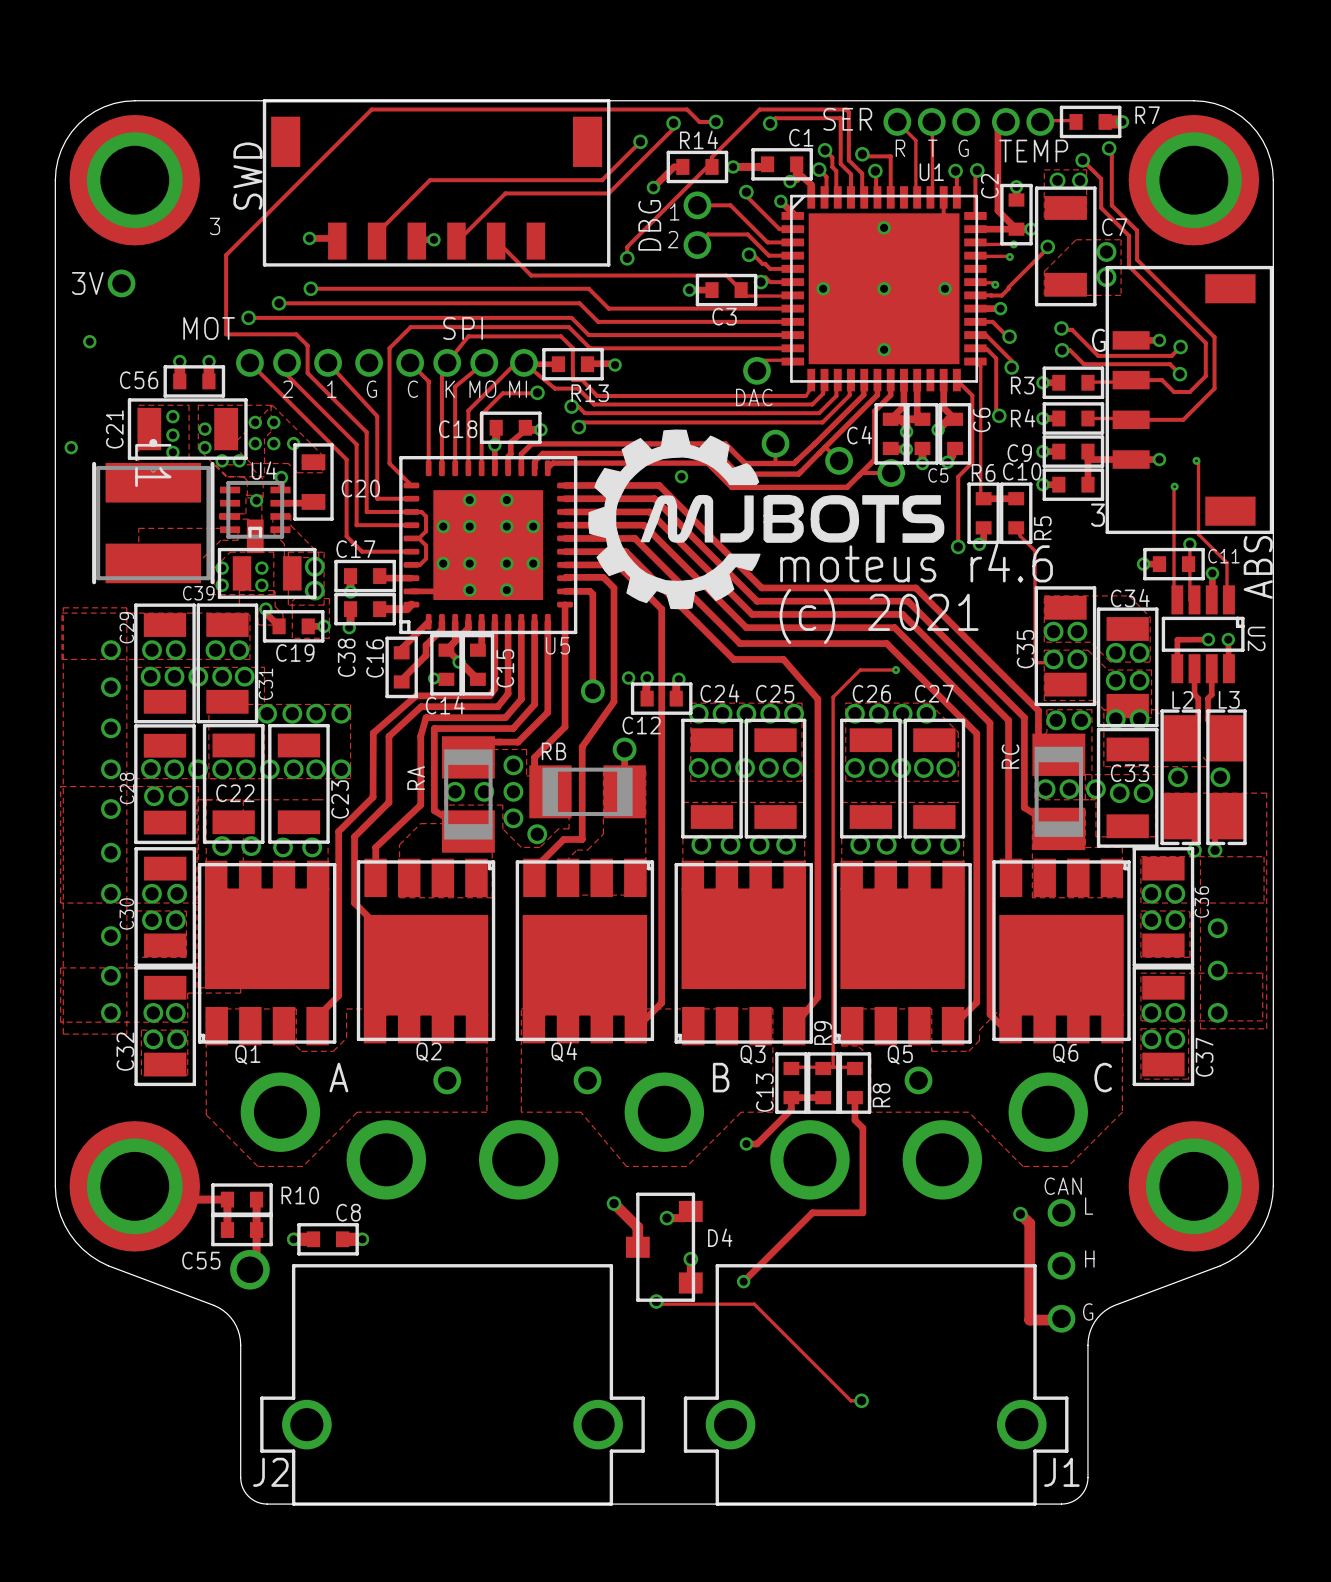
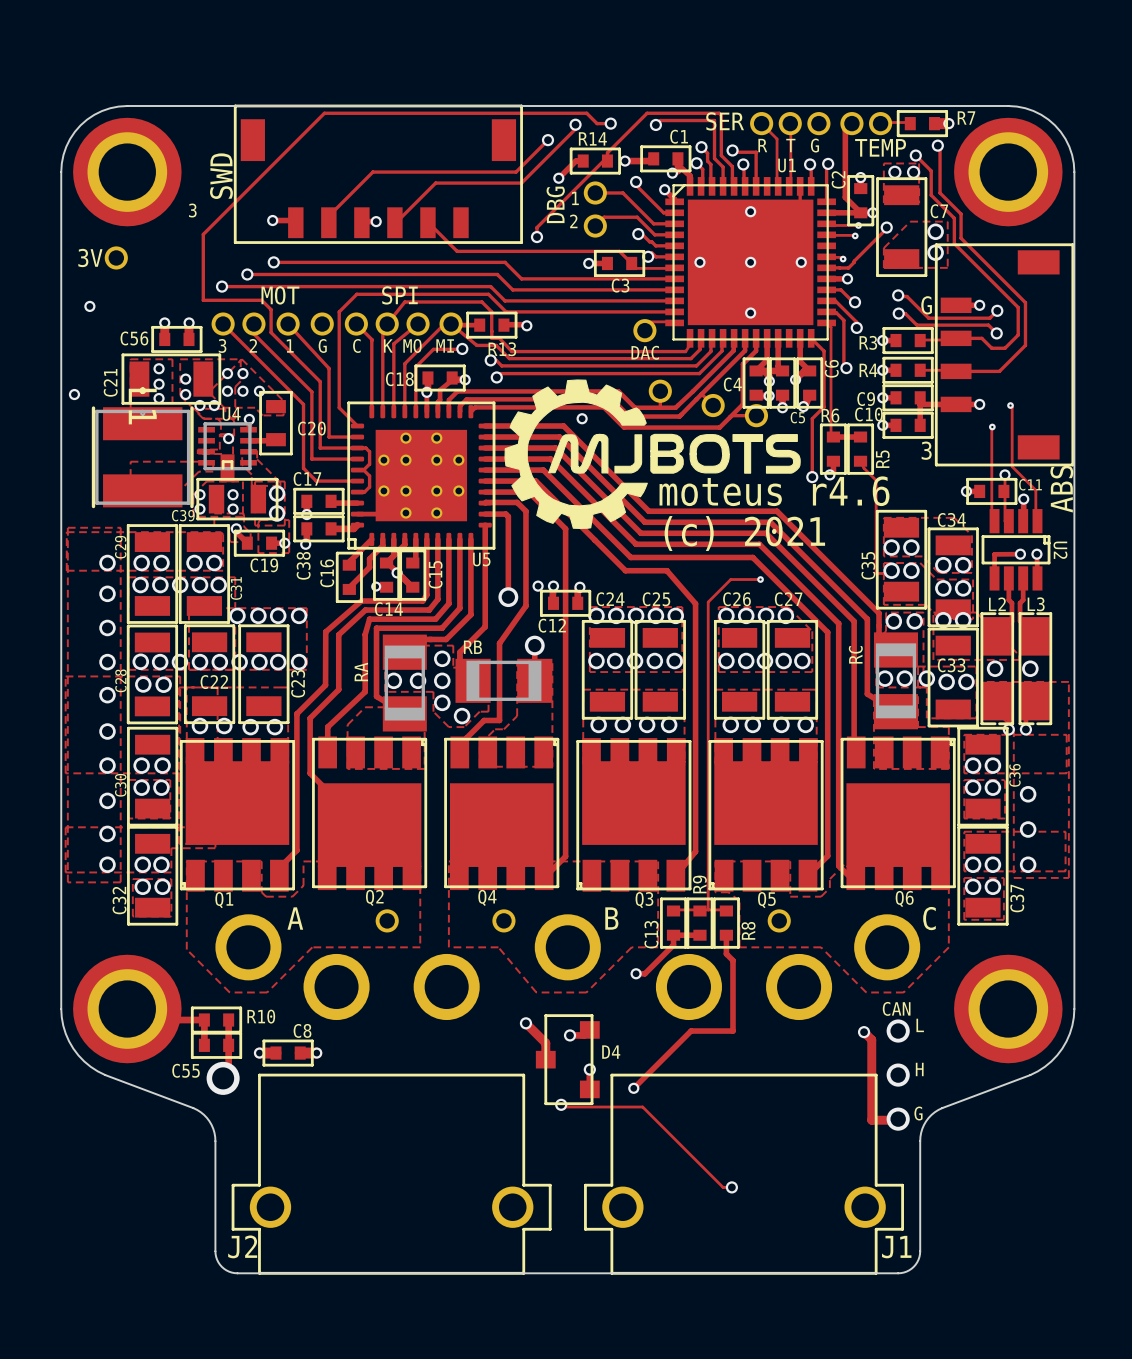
text position: MOT (209, 328) -> MOT (280, 295)
text: none -> 3 (222, 345)

